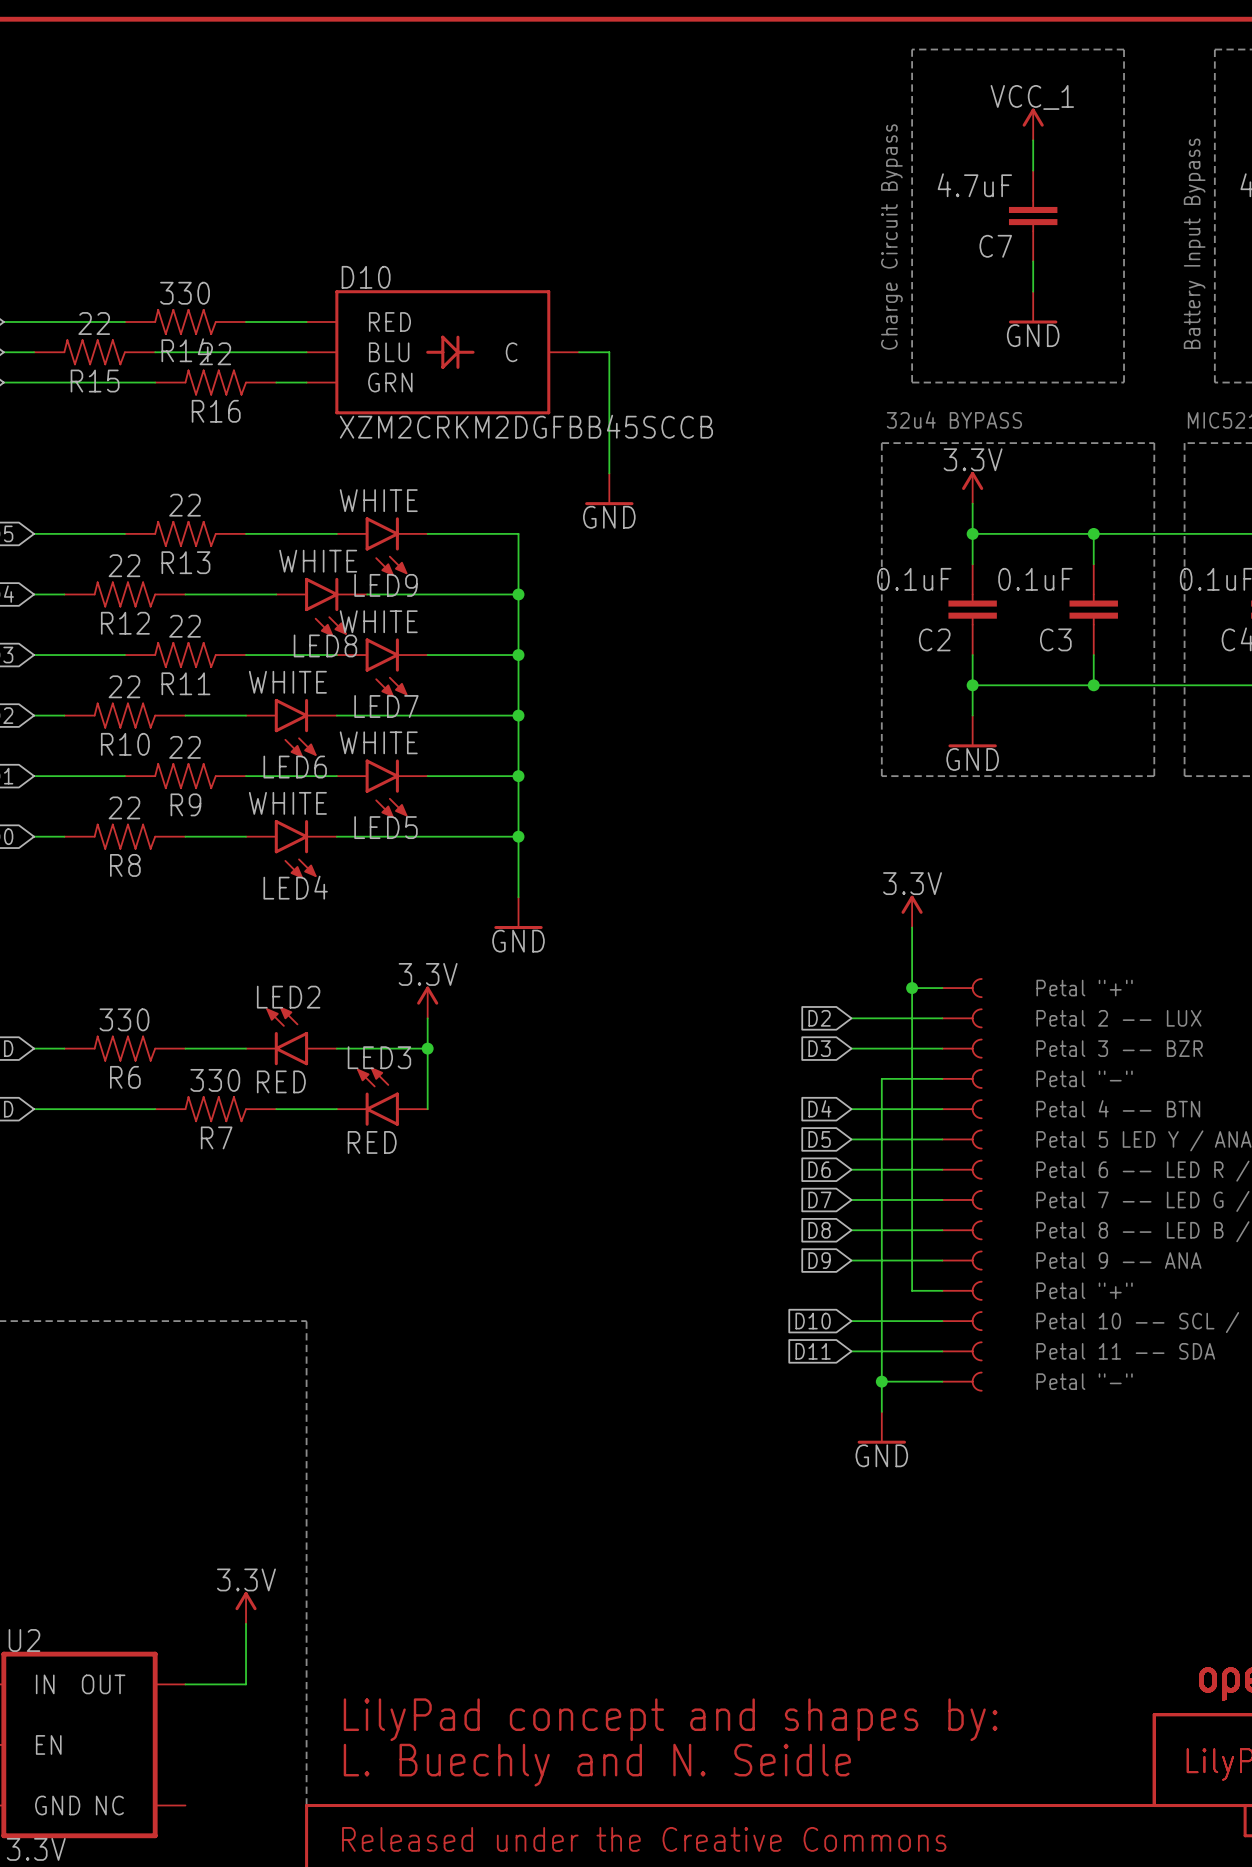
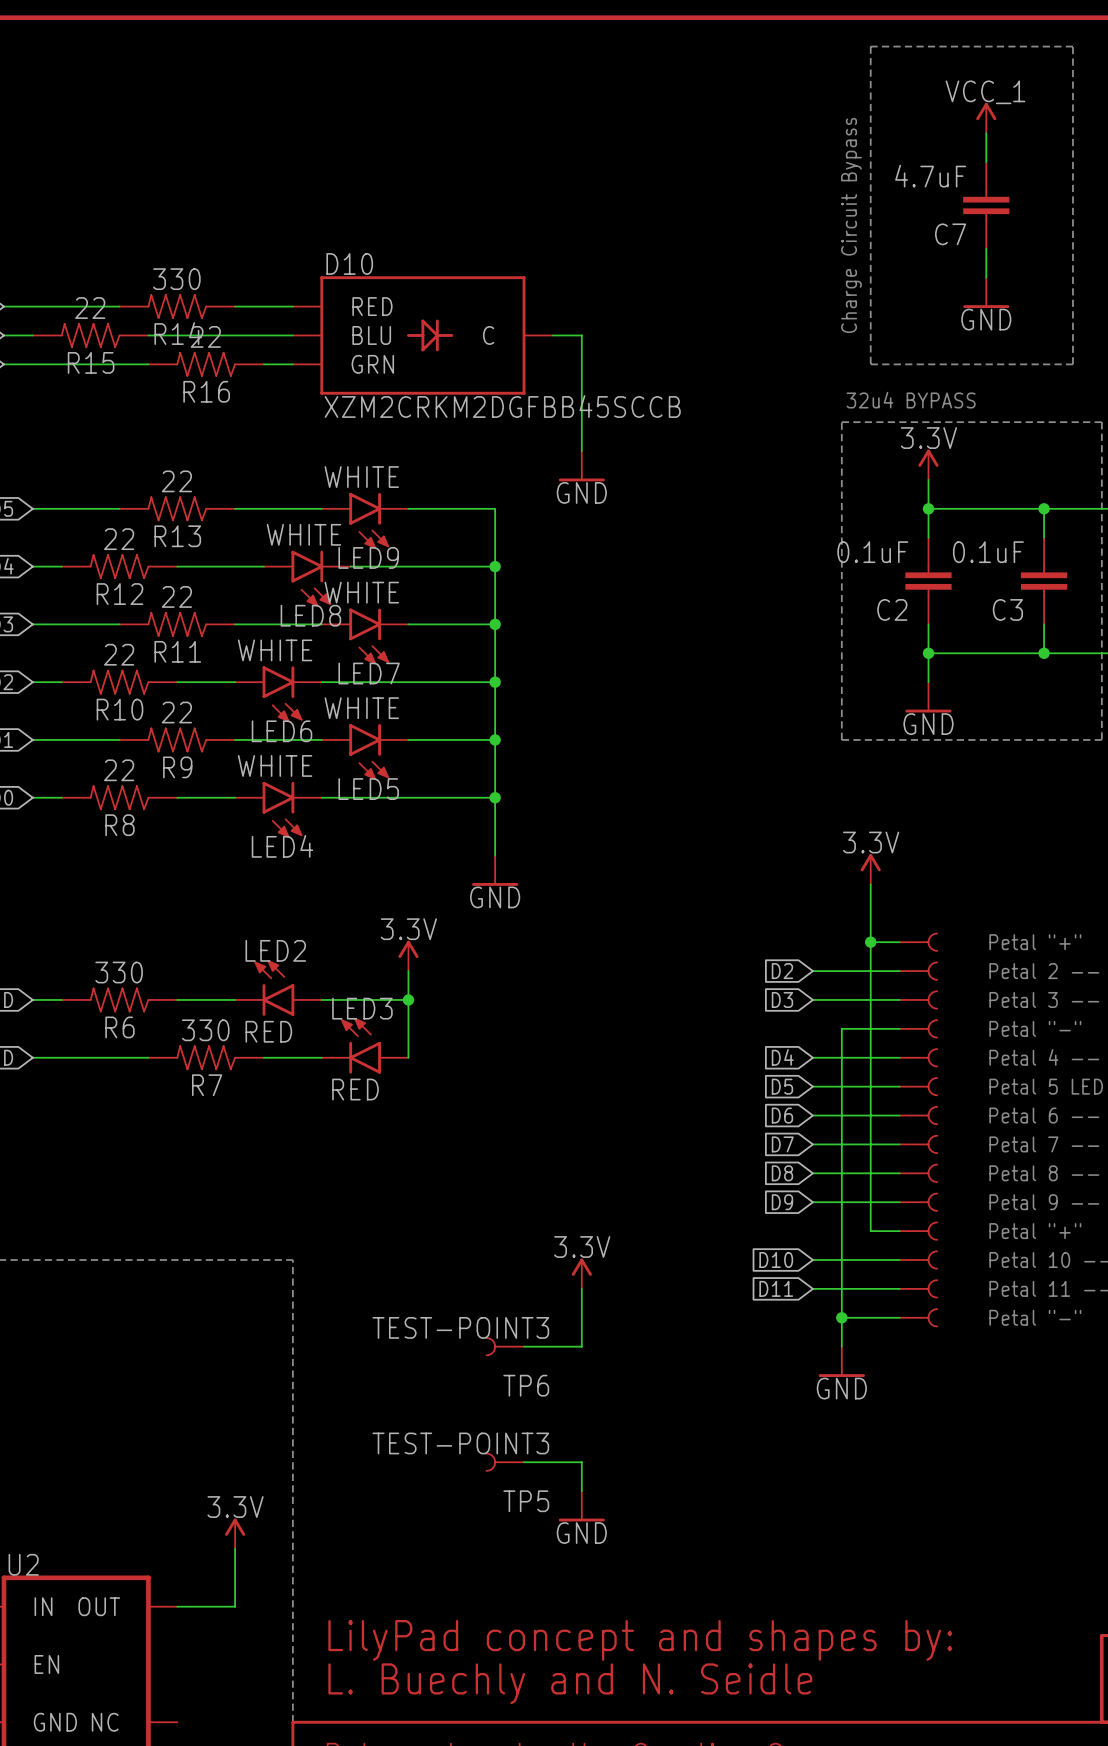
power symbol: none -> 3.3V (581, 1273)
wire: none -> (581, 1288) (581, 1346) (524, 1346)
TP6: none -> TEST-POINT3 (505, 1346)
TP5: none -> TEST-POINT3 (505, 1462)
wire: none -> (524, 1462) (581, 1462) (581, 1491)
power symbol: none -> GND (581, 1506)

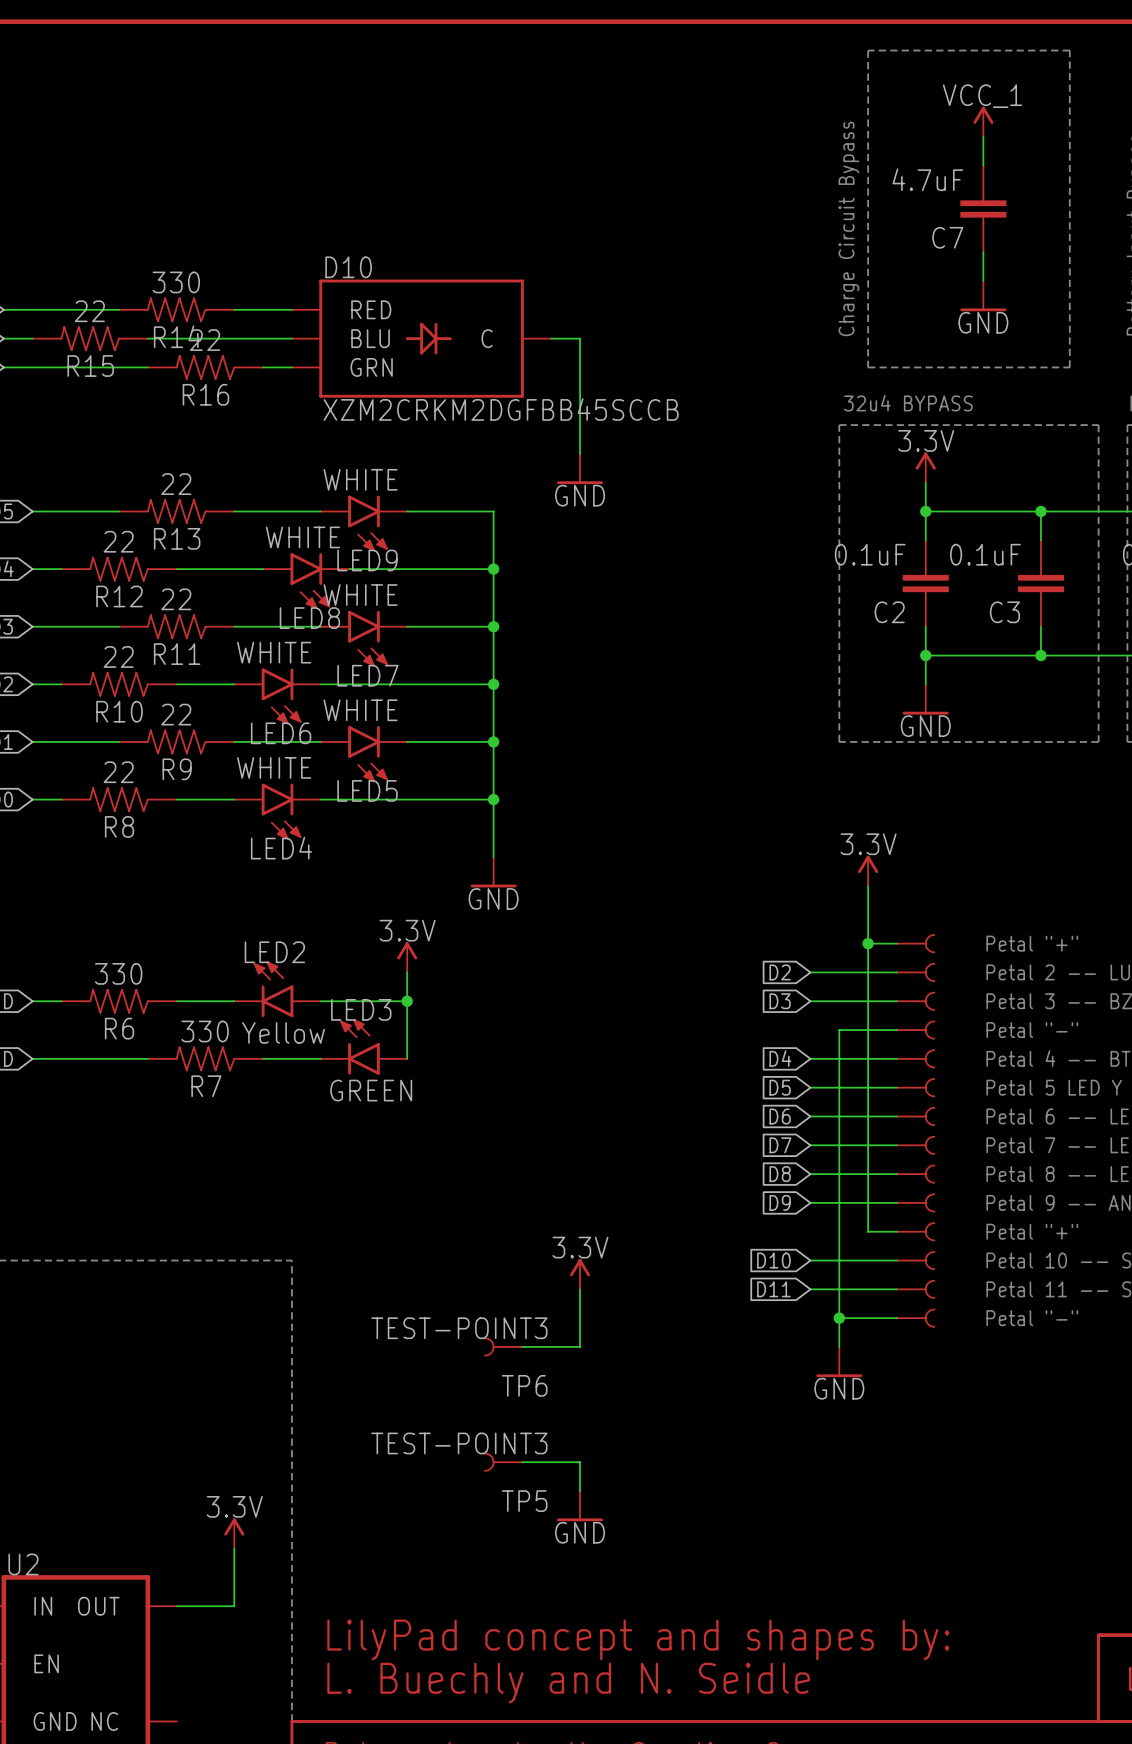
LED2 value: RED (268, 1031) -> Yellow (283, 1032)
LED3 value: RED (355, 1089) -> GREEN (371, 1090)

